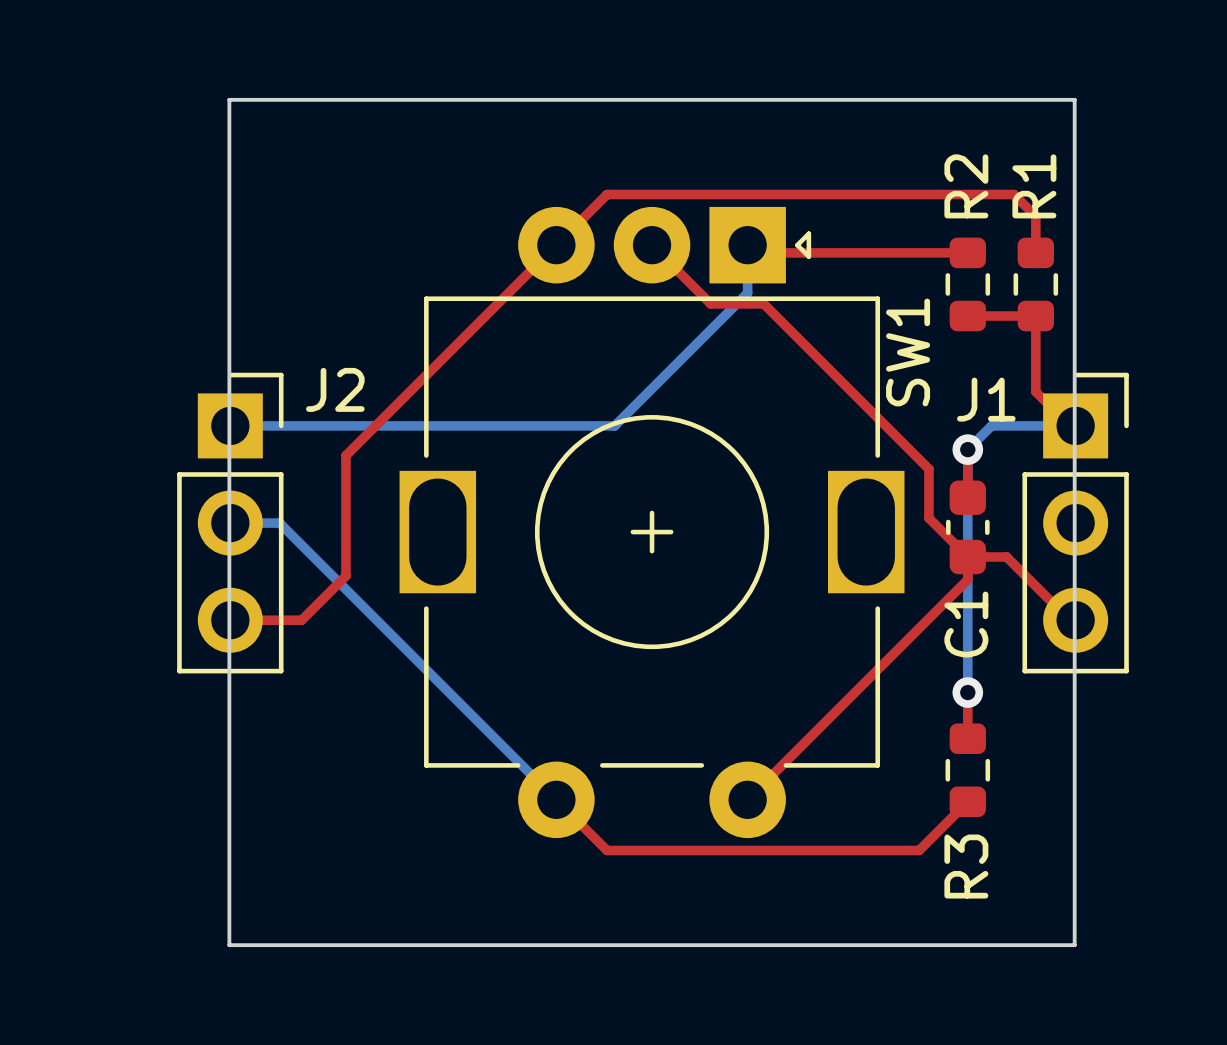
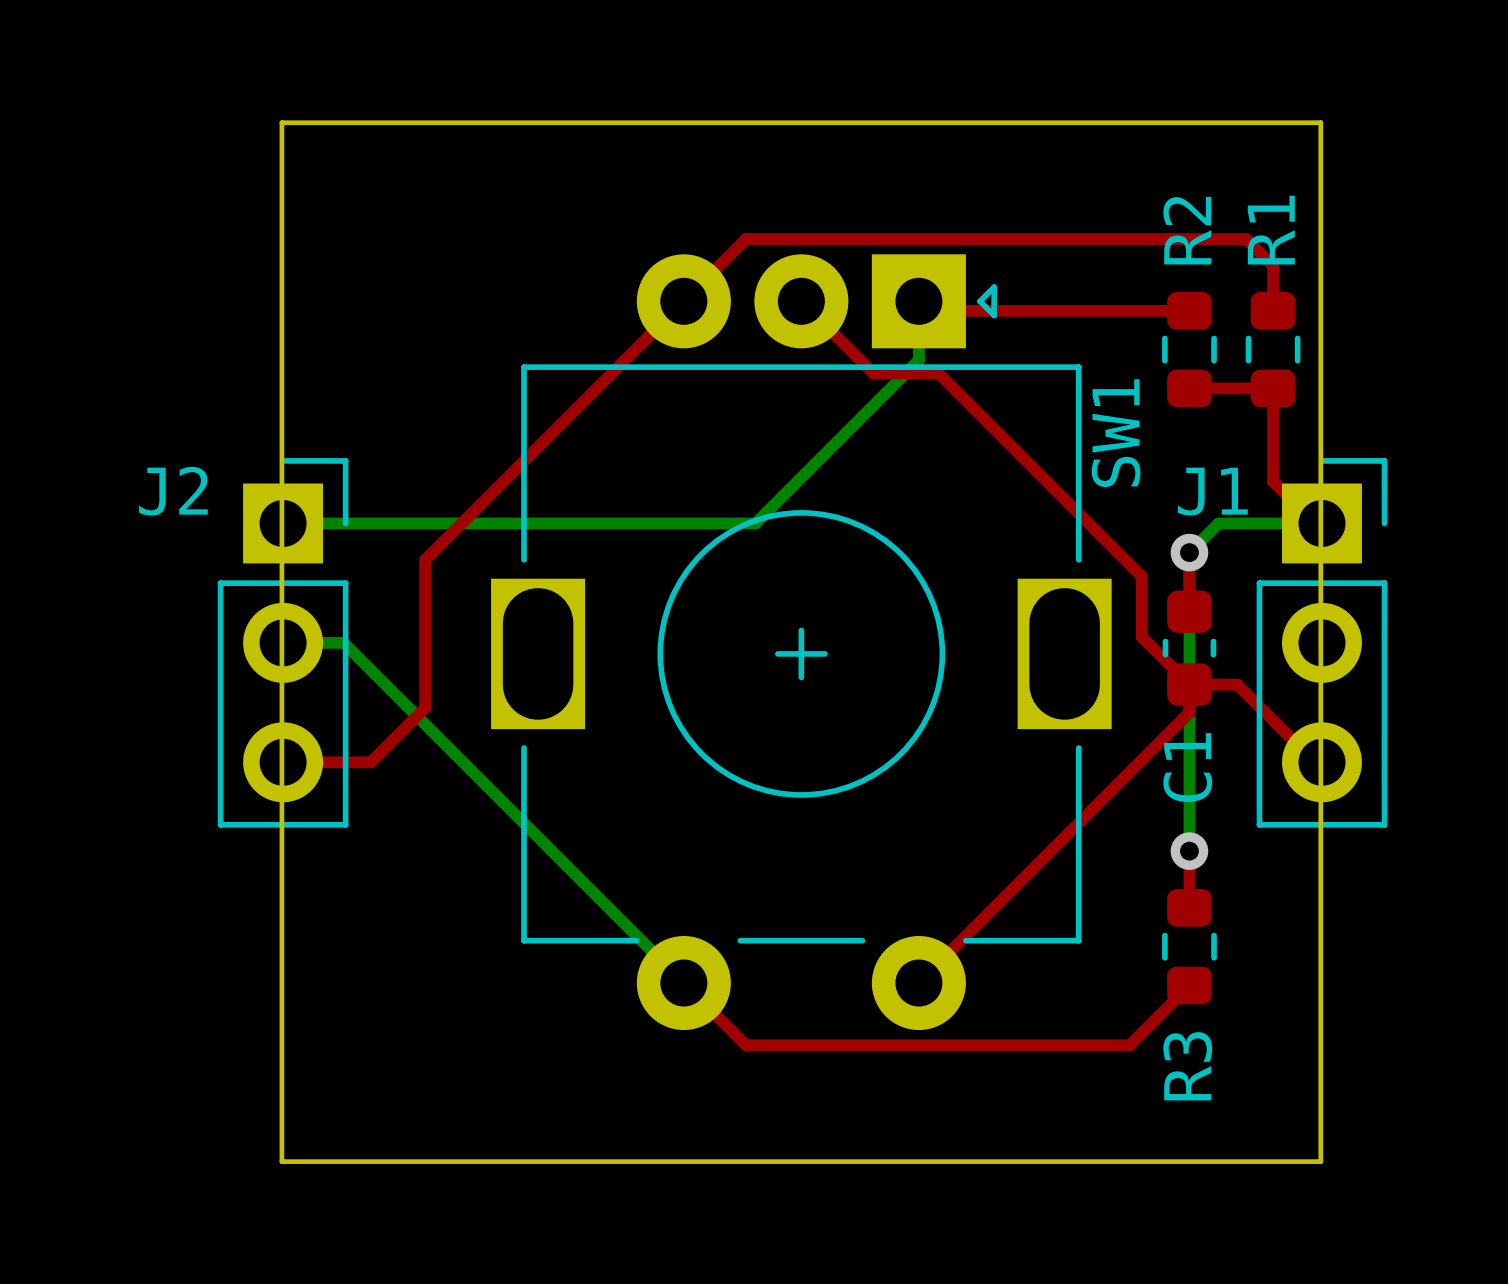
J2 name position: J2 (335, 389) -> J2 (173, 491)

